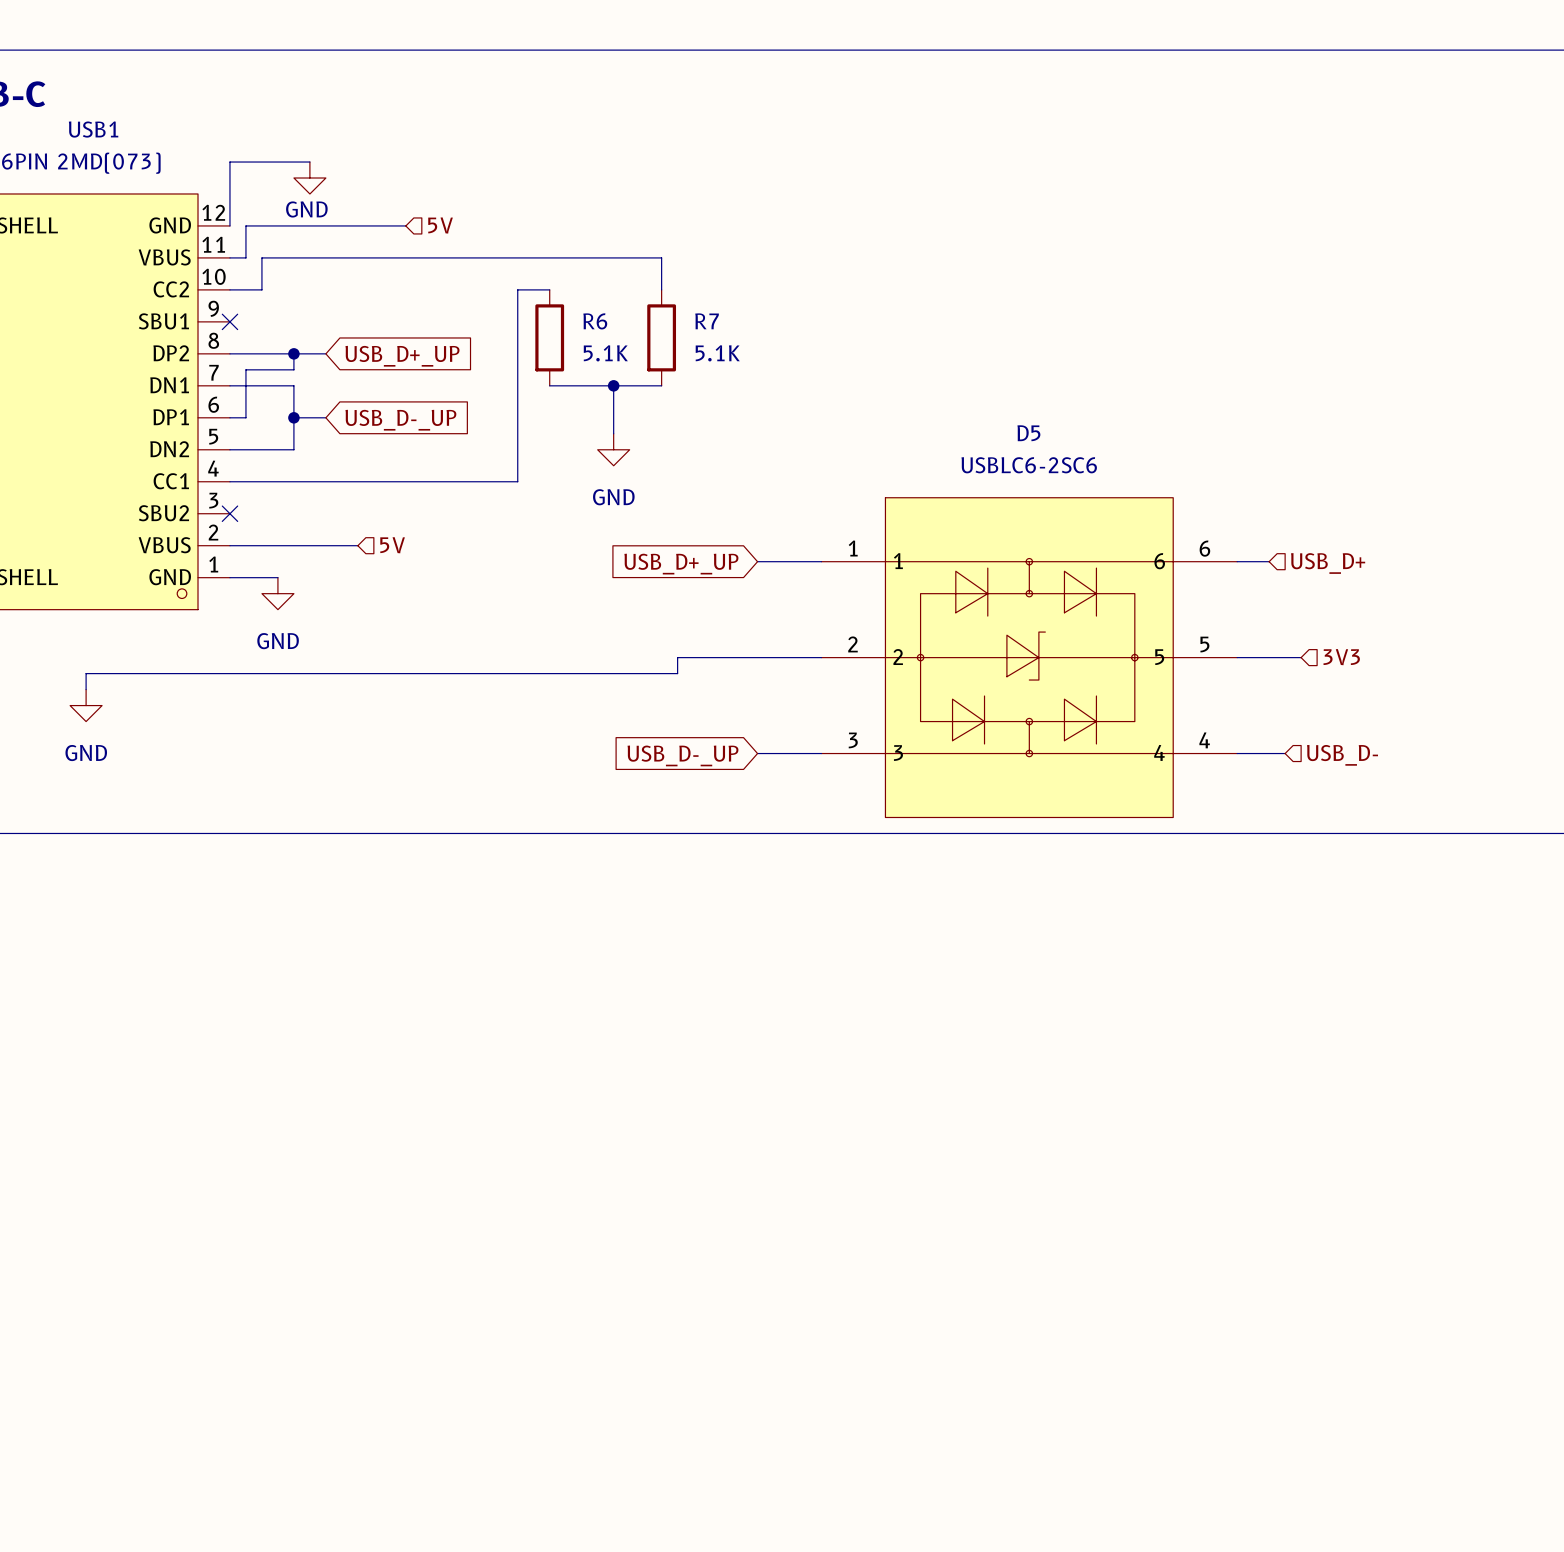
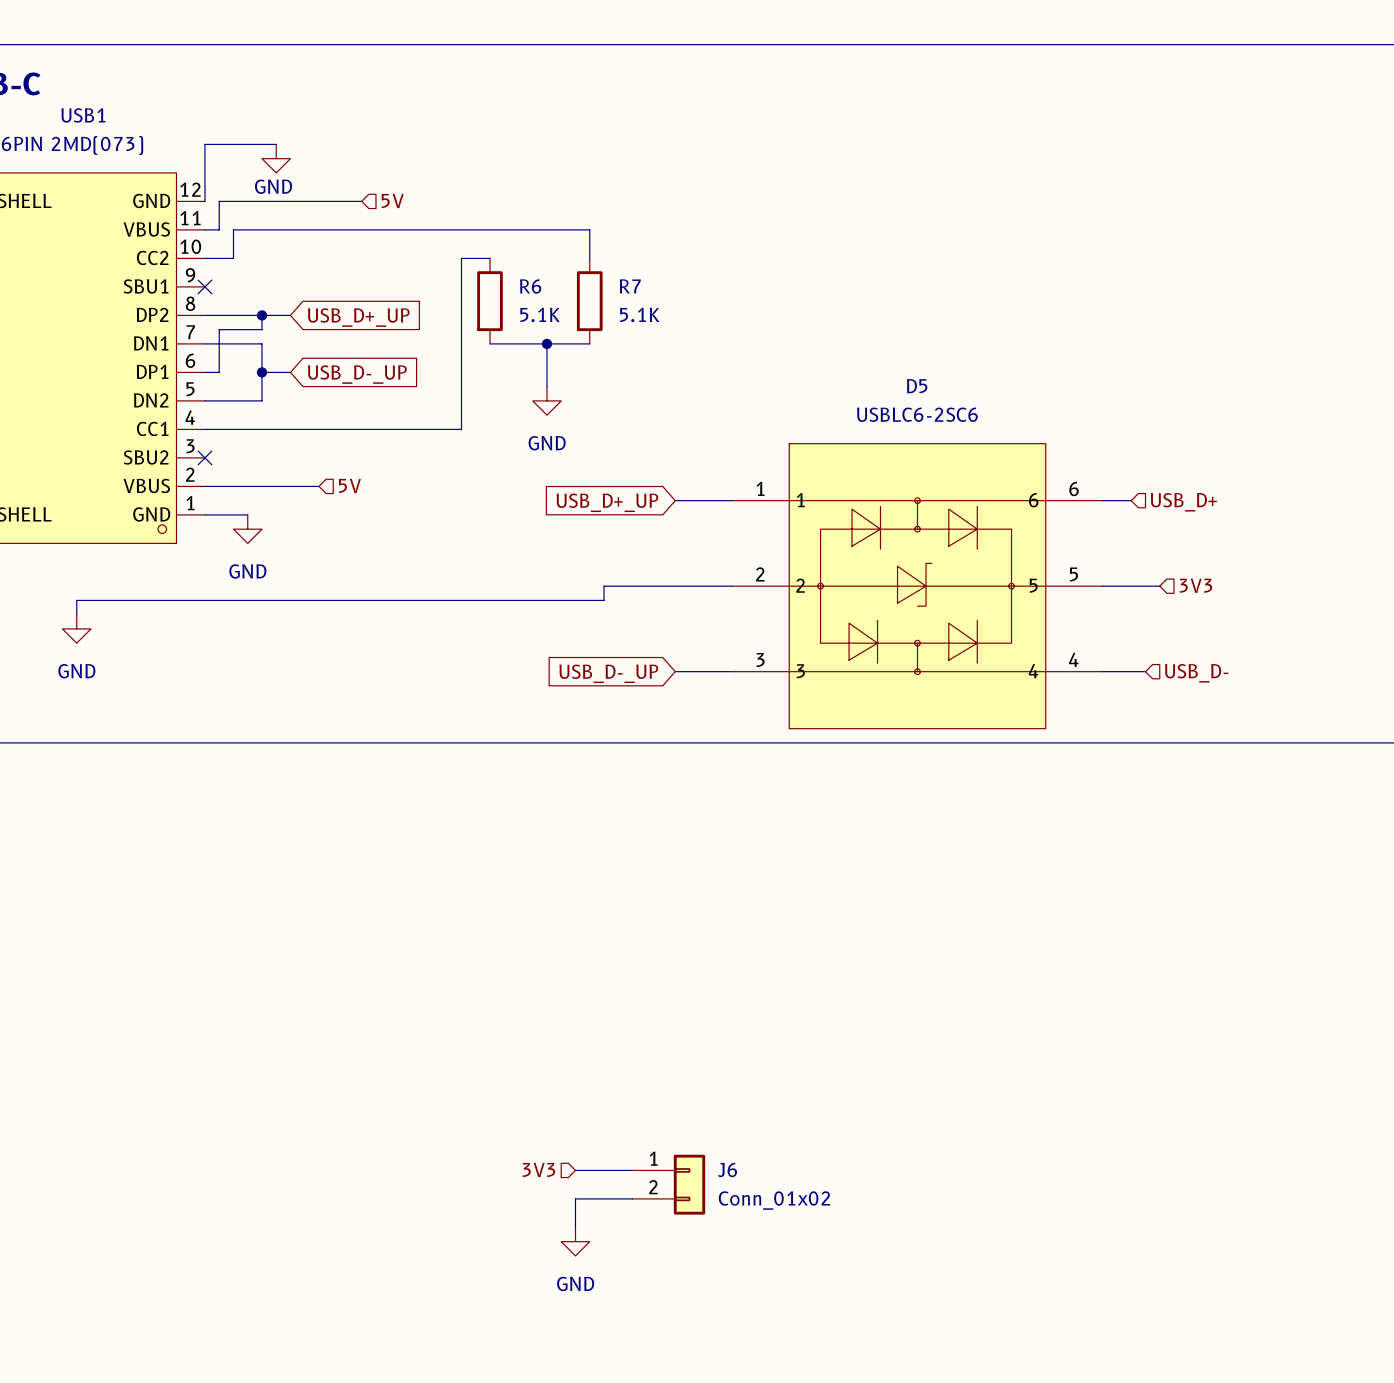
hierarchical label: none -> 3V3 (538, 1169)
wire: none -> (575, 1170) (632, 1170)
J6: none -> Conn_01x02 (668, 1184)
wire: none -> (632, 1198) (575, 1198) (575, 1227)
power symbol: none -> GND (575, 1241)

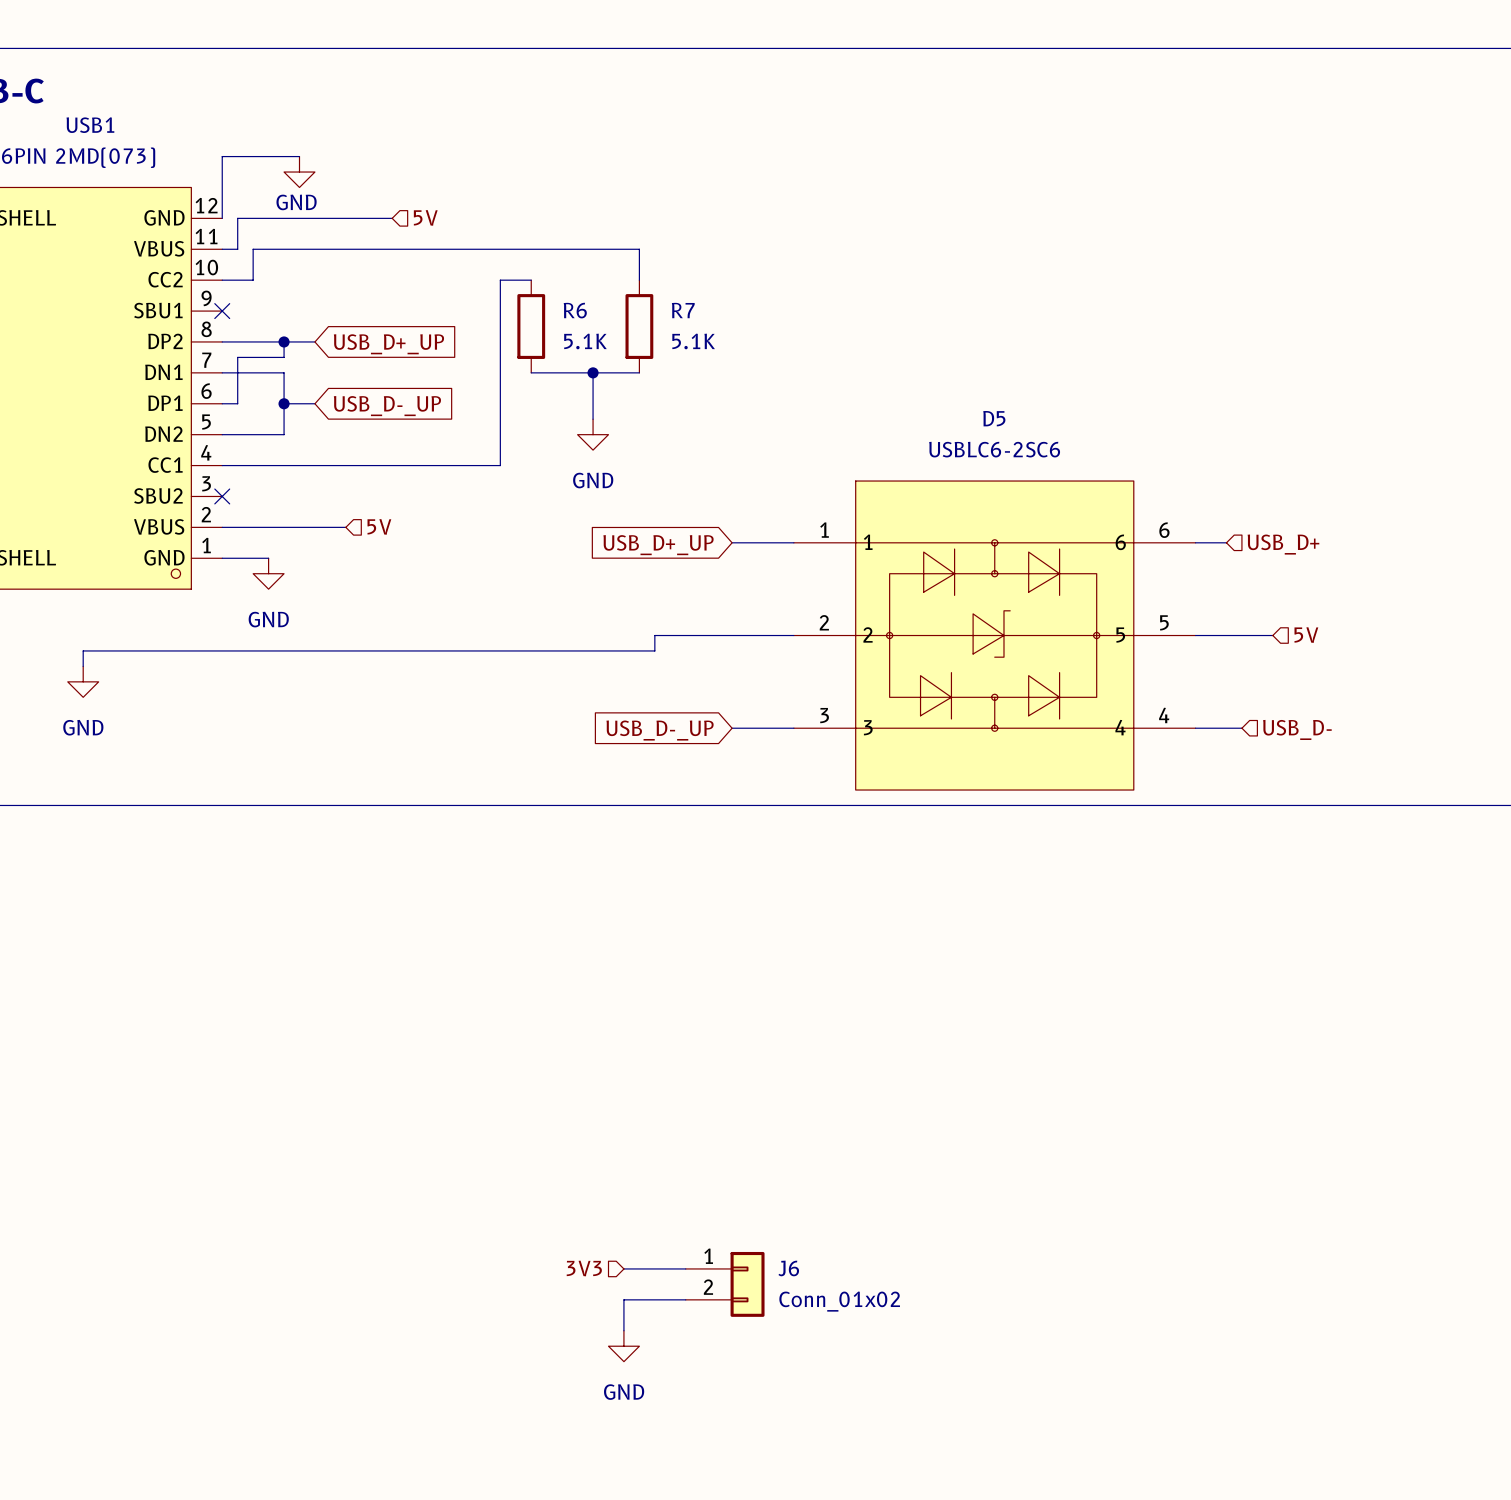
hierarchical label: 3V3 (1195, 585) -> none
hierarchical label: none -> 5V (1306, 635)
wire: none -> (1257, 635) (1272, 635)

